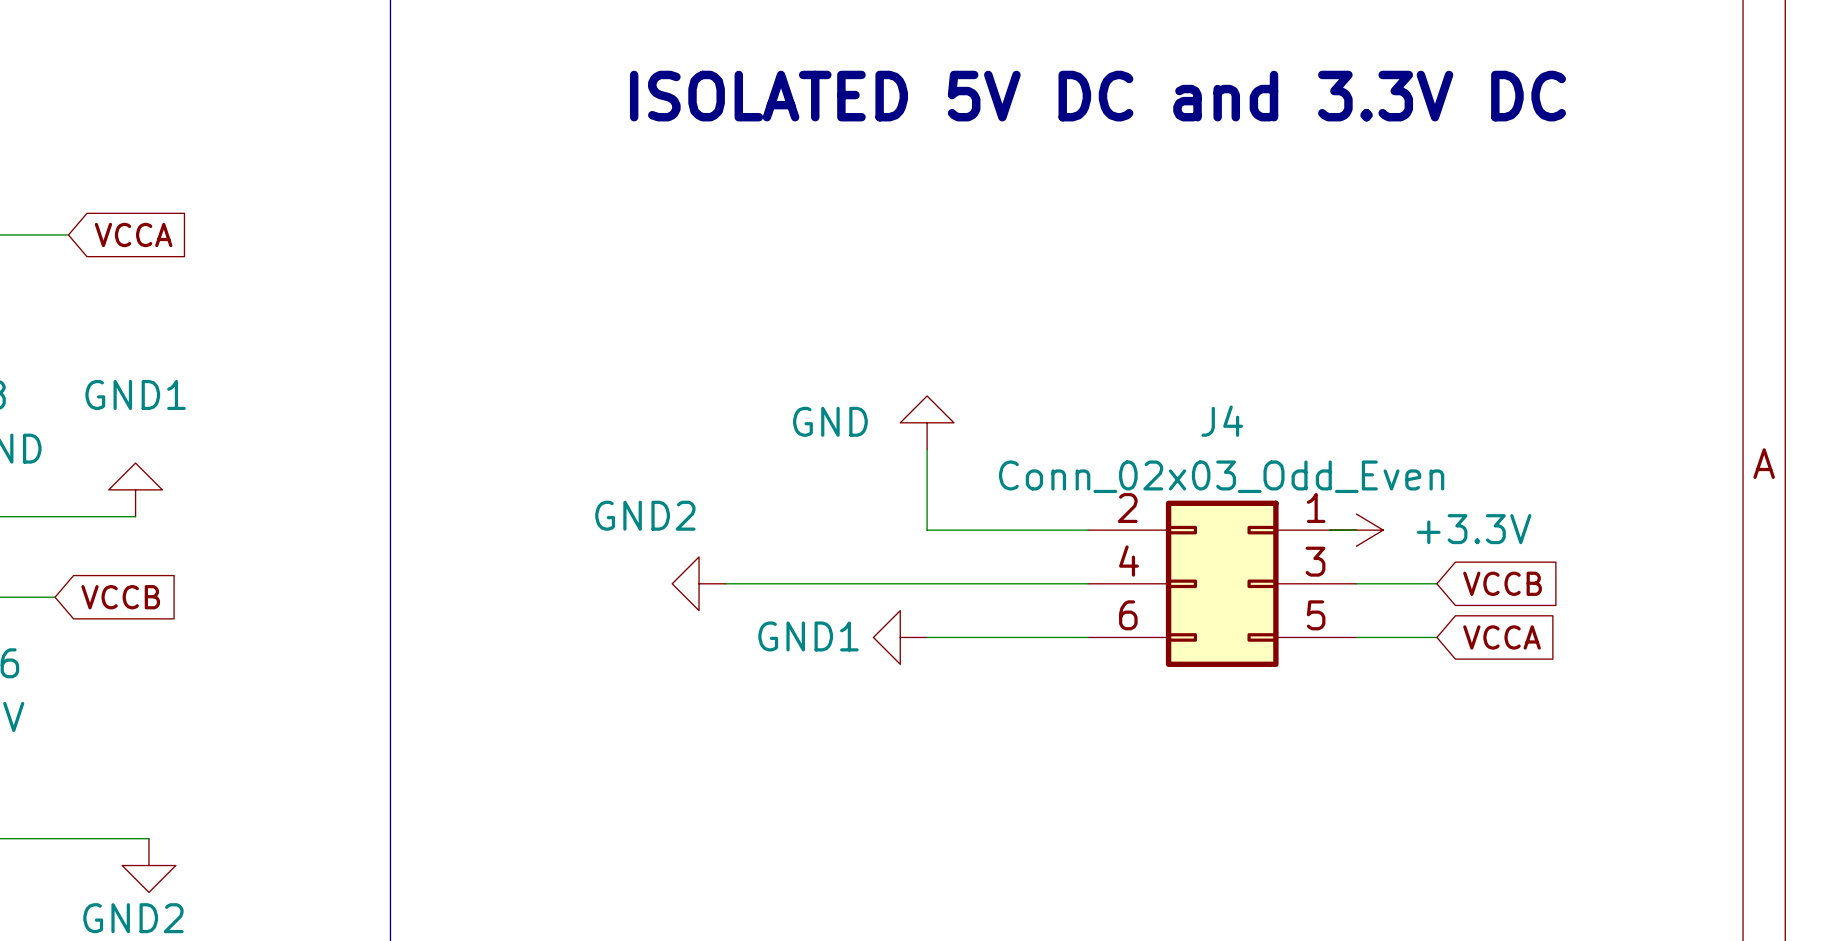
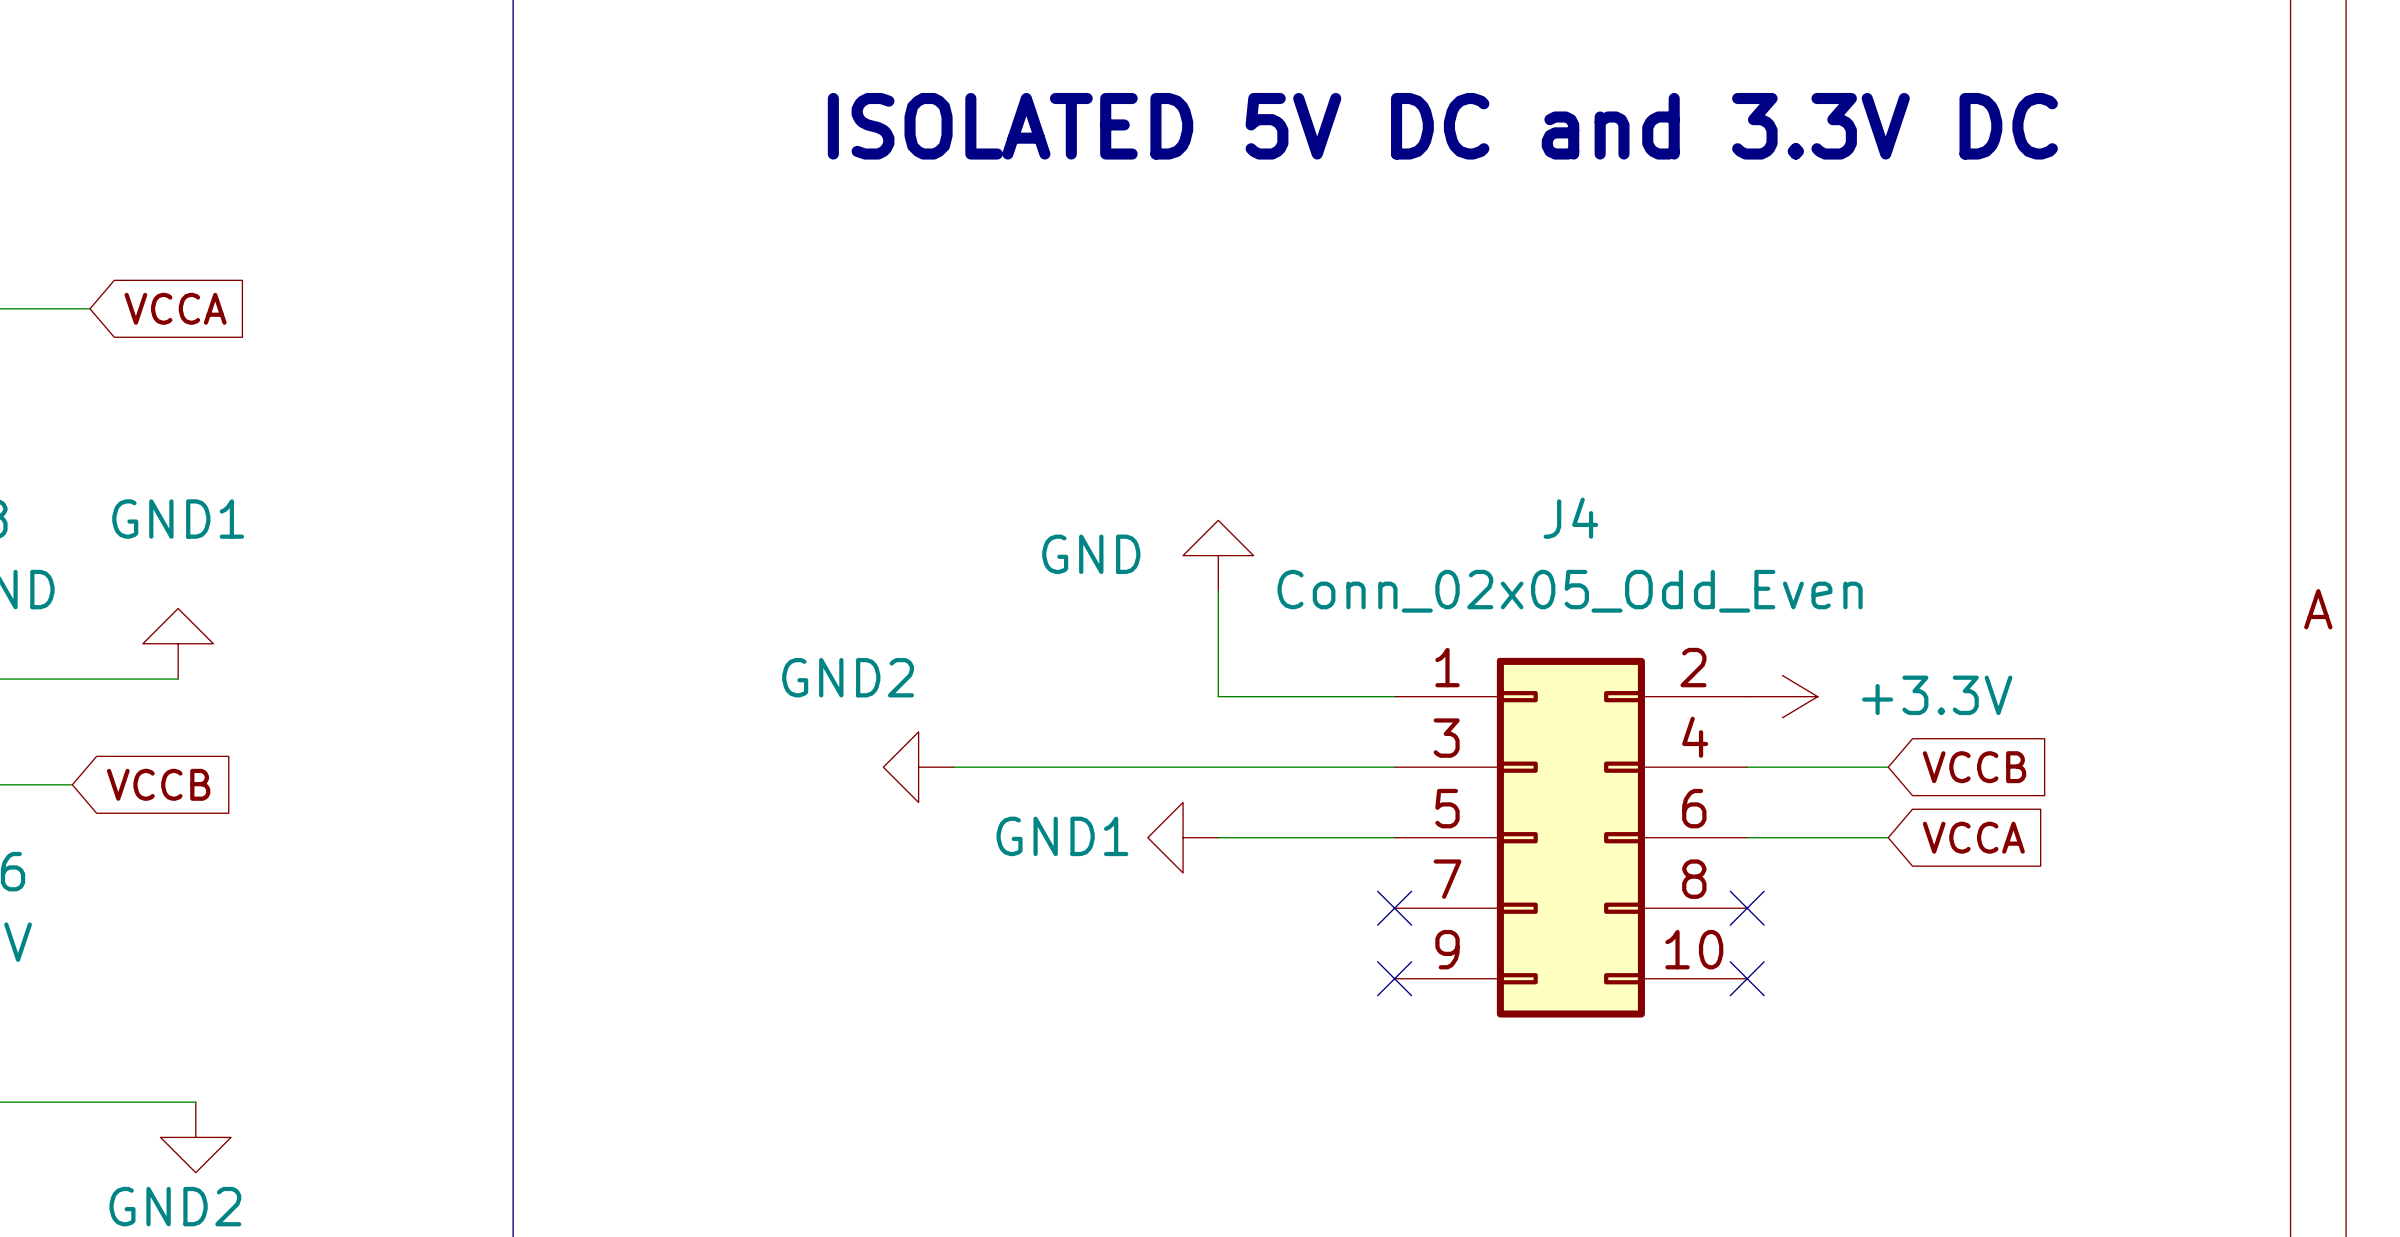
J4 name position: J4 (1222, 421) -> J4 (1570, 518)
J4 value: Conn_02x03_Odd_Even (1221, 476) -> Conn_02x05_Odd_Even (1570, 591)
J4 symbol: [1088, 500, 1357, 667] -> [1394, 657, 1748, 1018]
no-connect mark: none -> (1394, 908)
no-connect mark: none -> (1747, 908)
no-connect mark: none -> (1394, 978)
no-connect mark: none -> (1747, 978)

